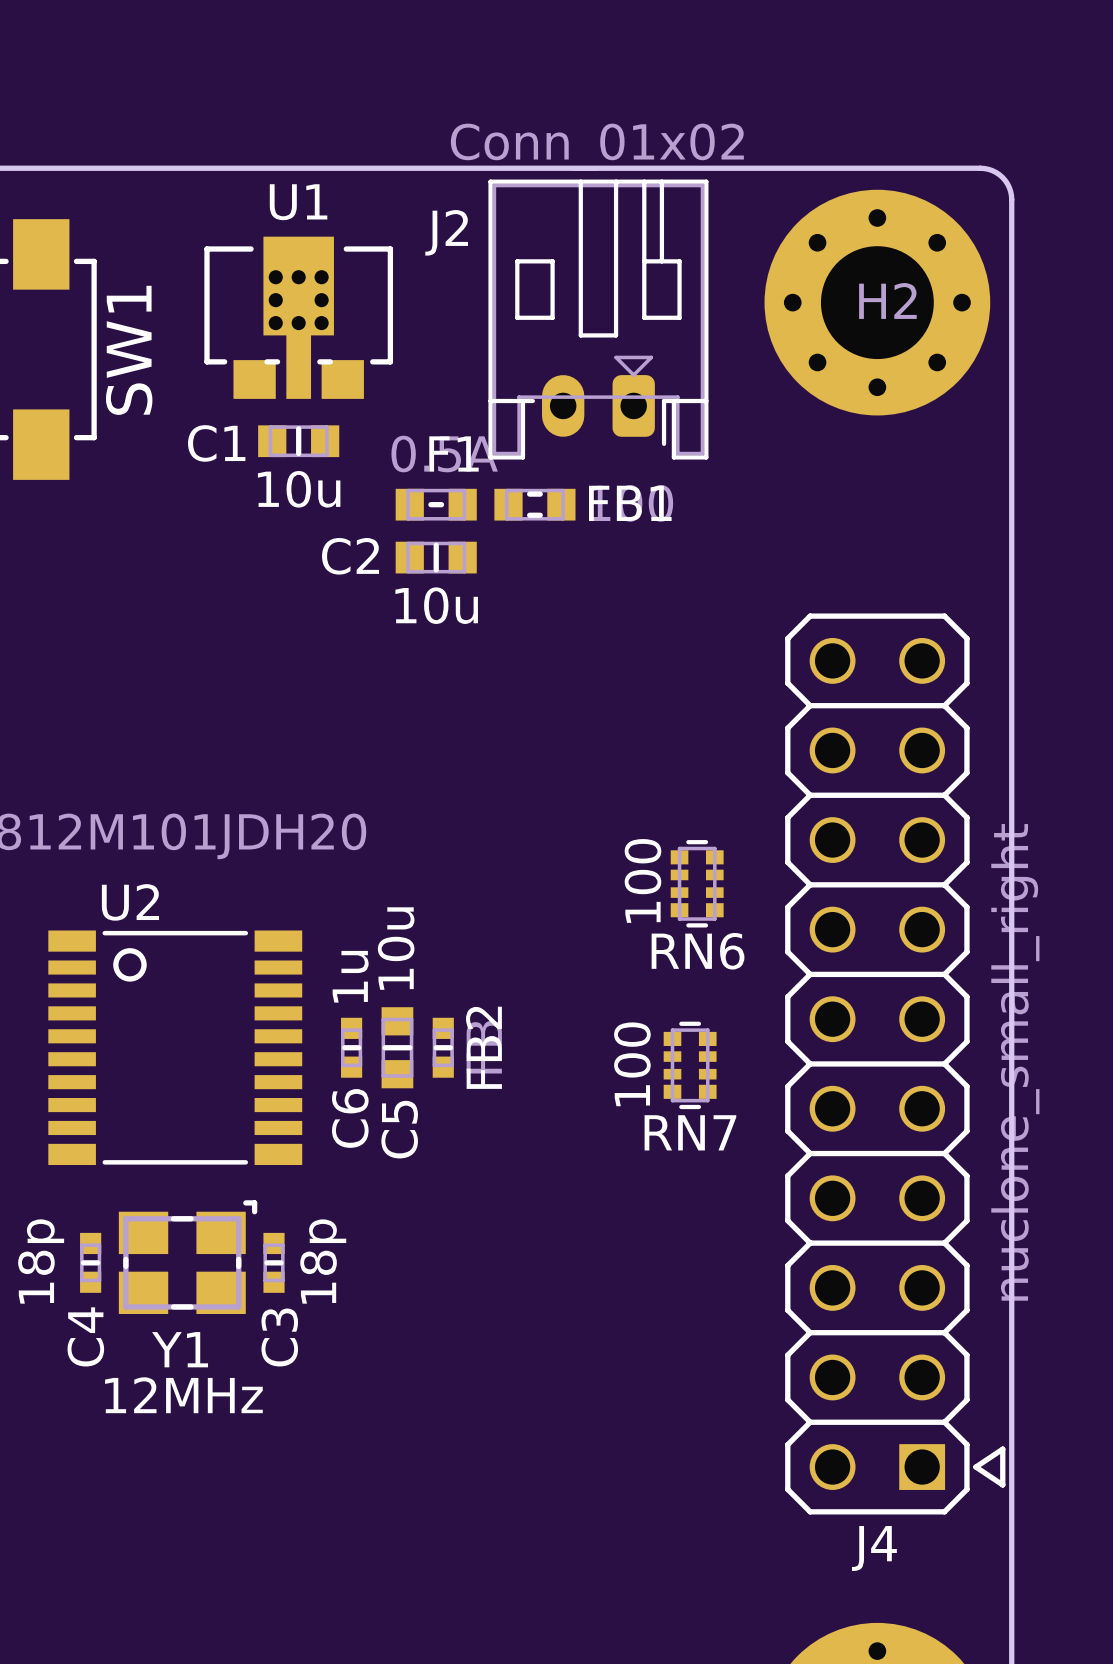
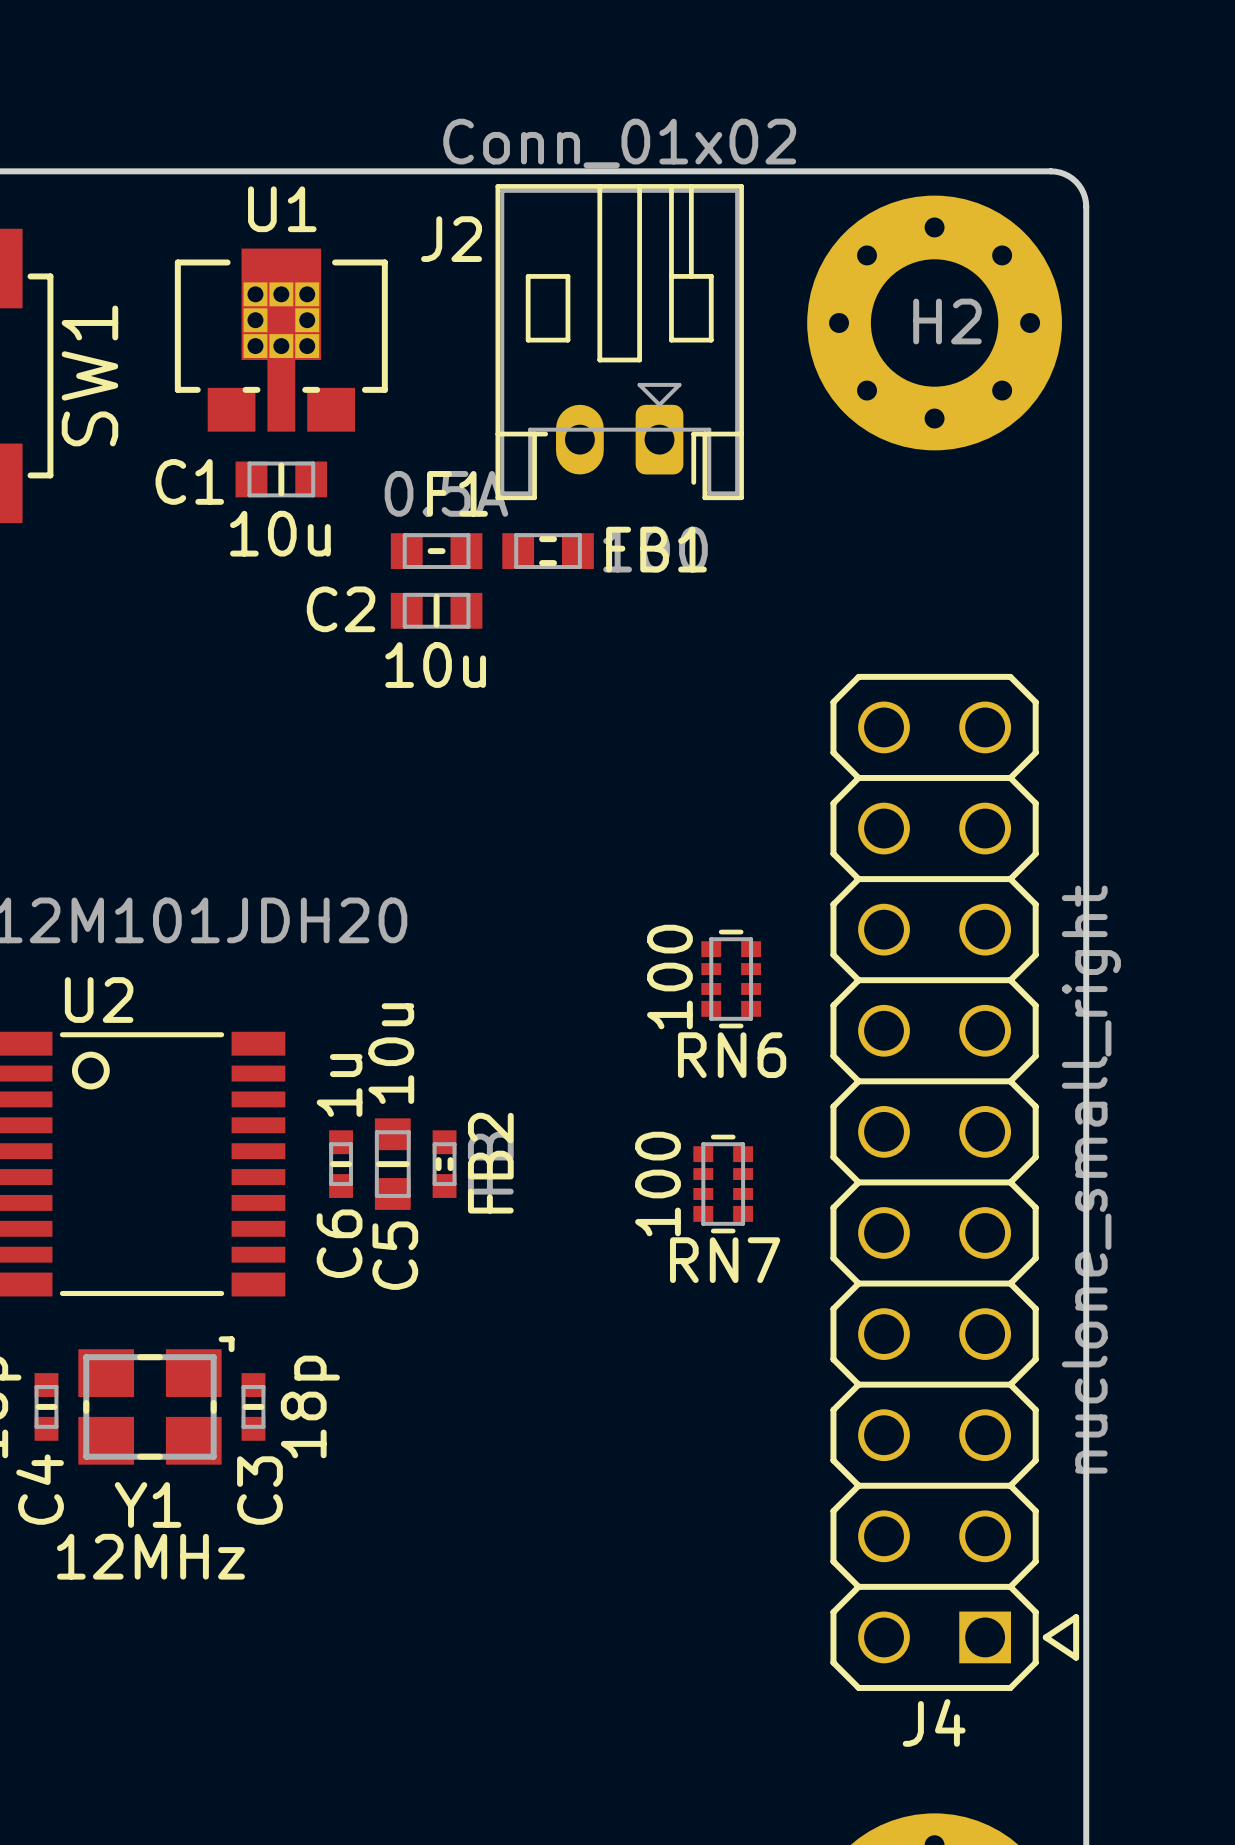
FB2 footprint: [432, 1017, 454, 1078] -> [432, 1130, 457, 1198]

